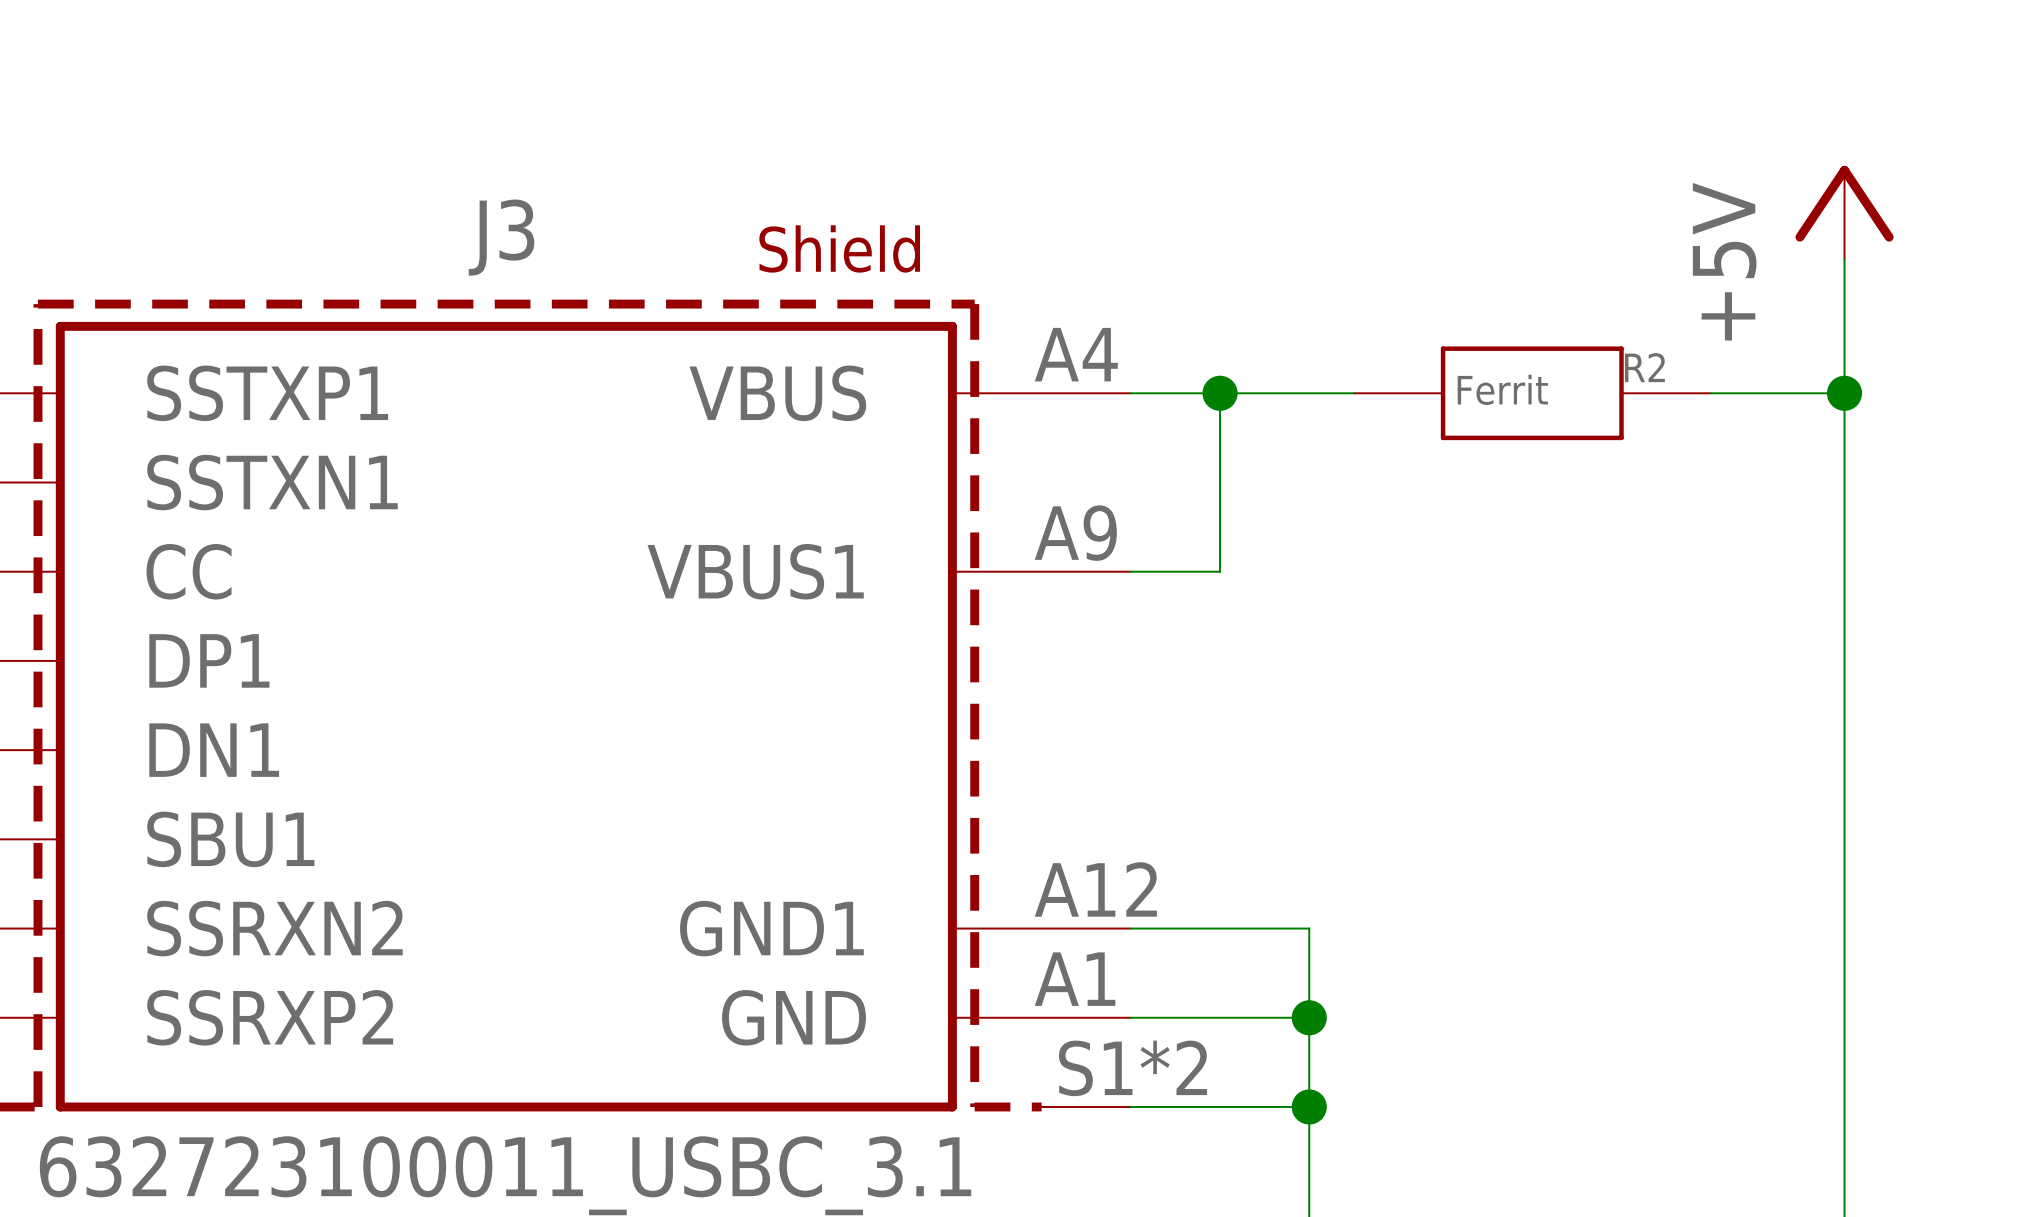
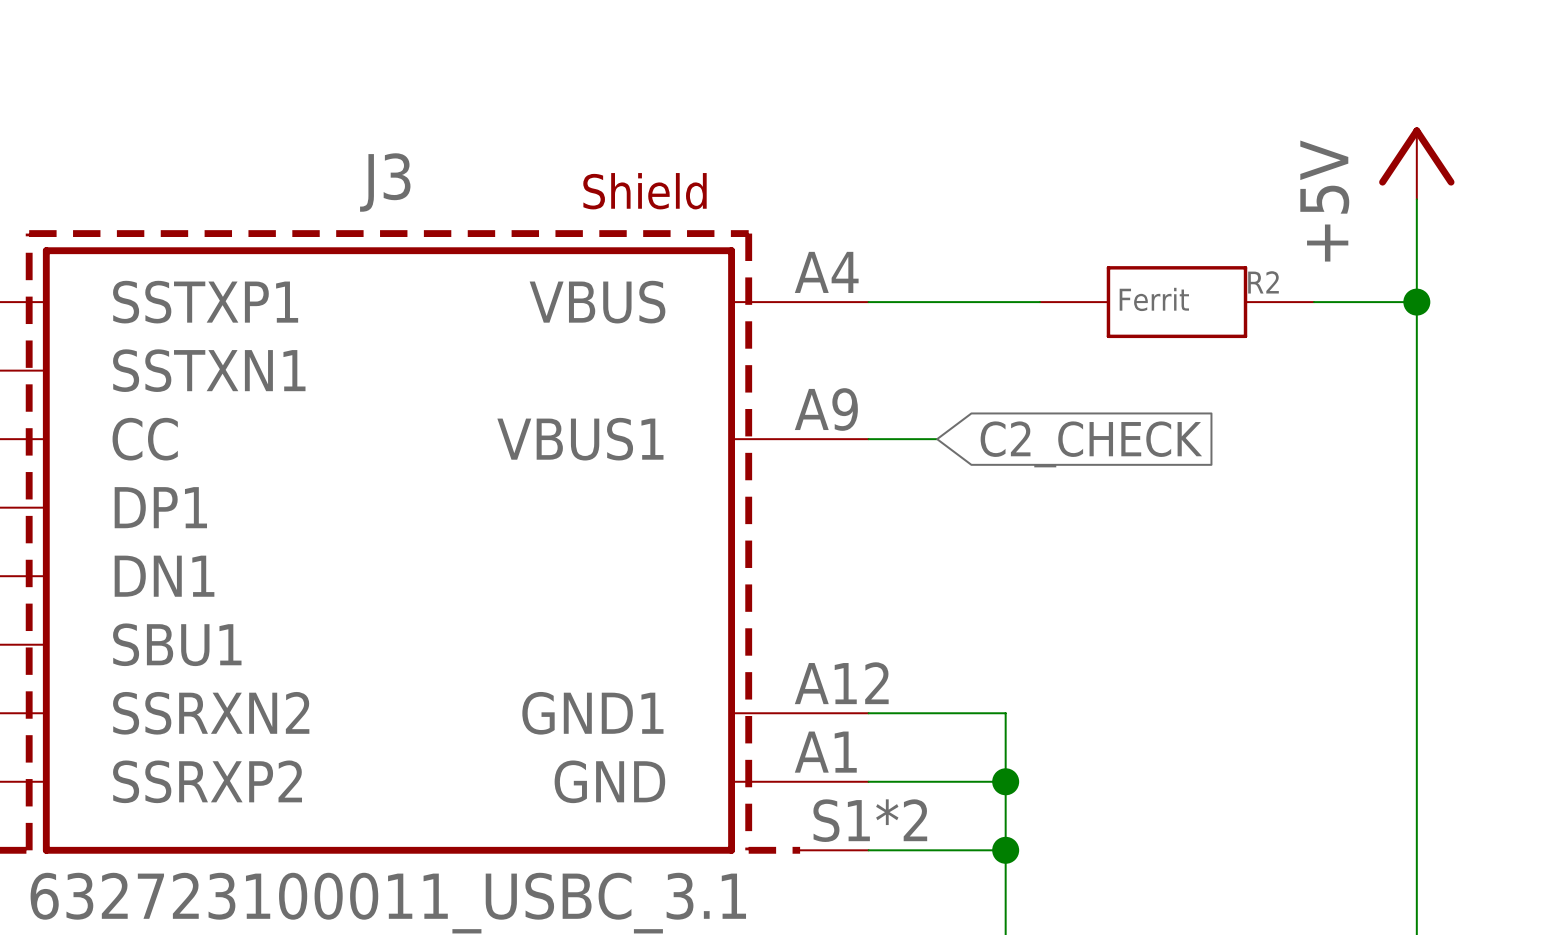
wire: (1220, 393) (1220, 571) -> none
junction: (1220, 393) -> none
global label: none -> C2_CHECK (1091, 444)

